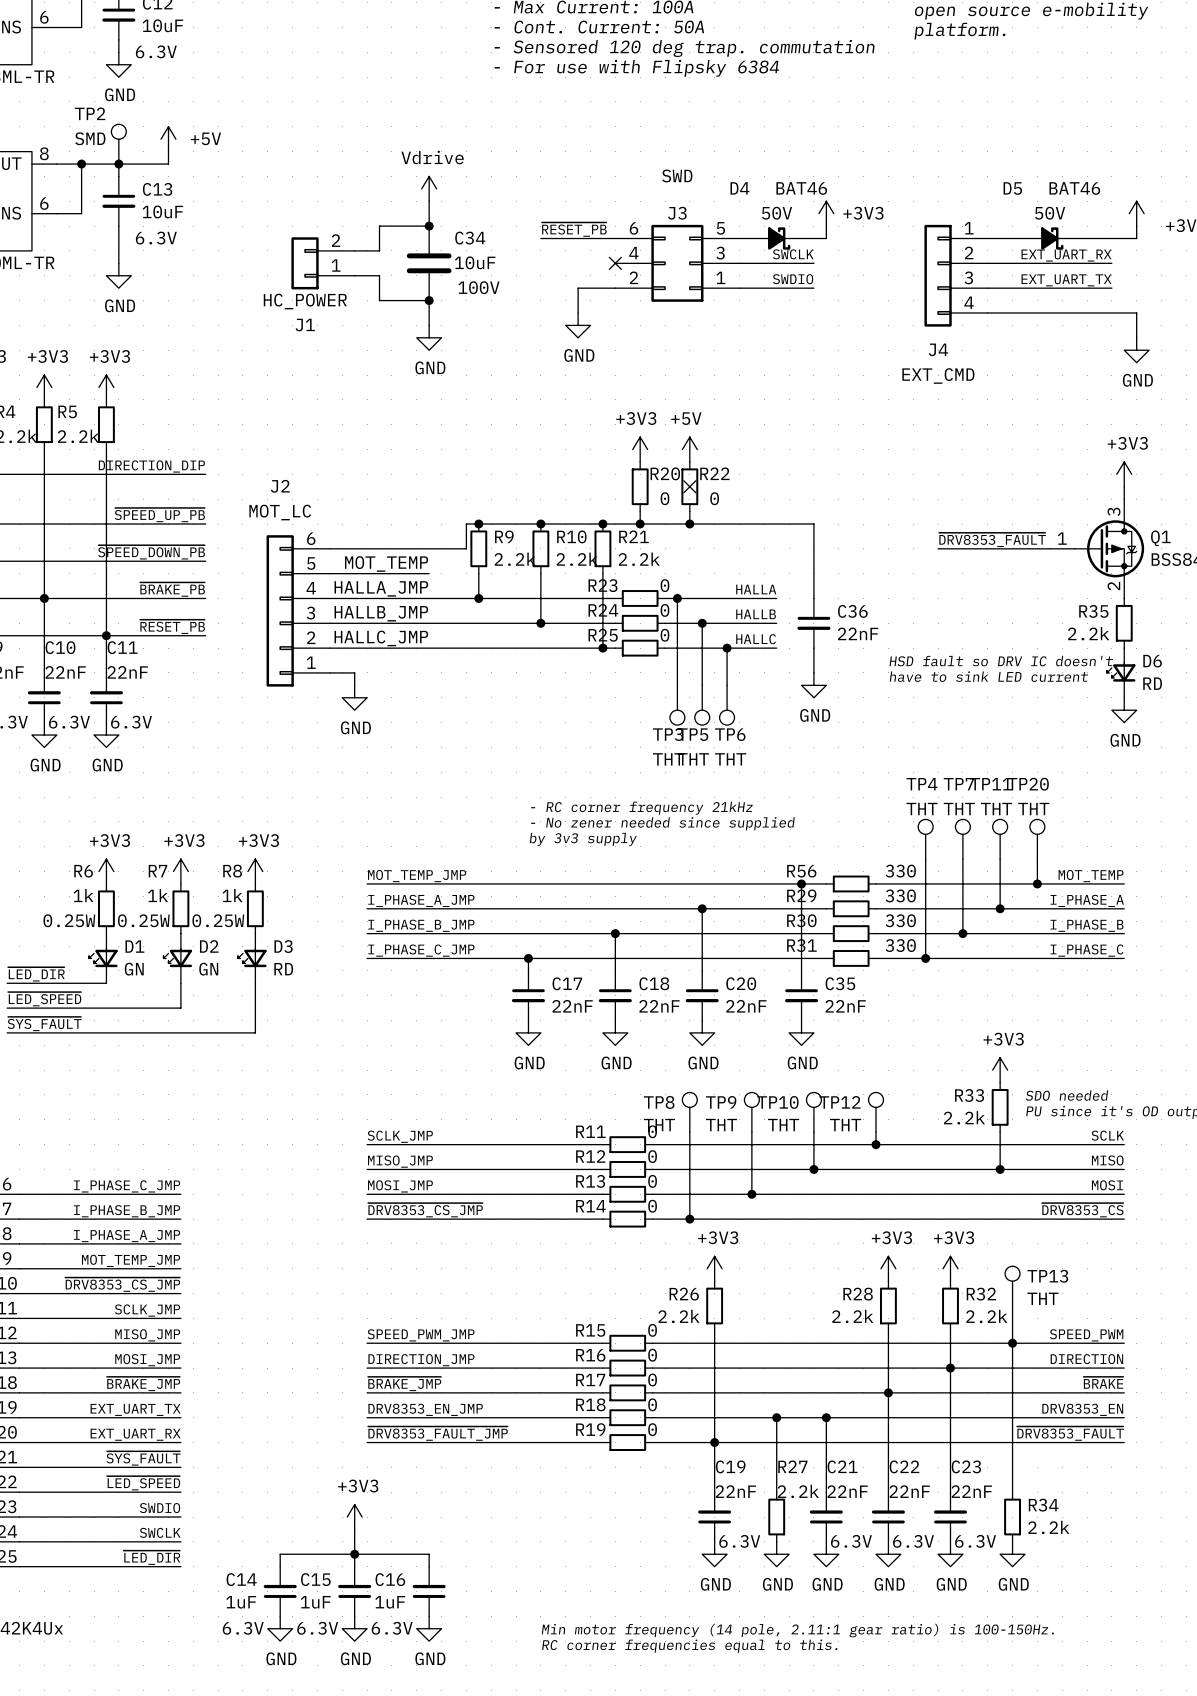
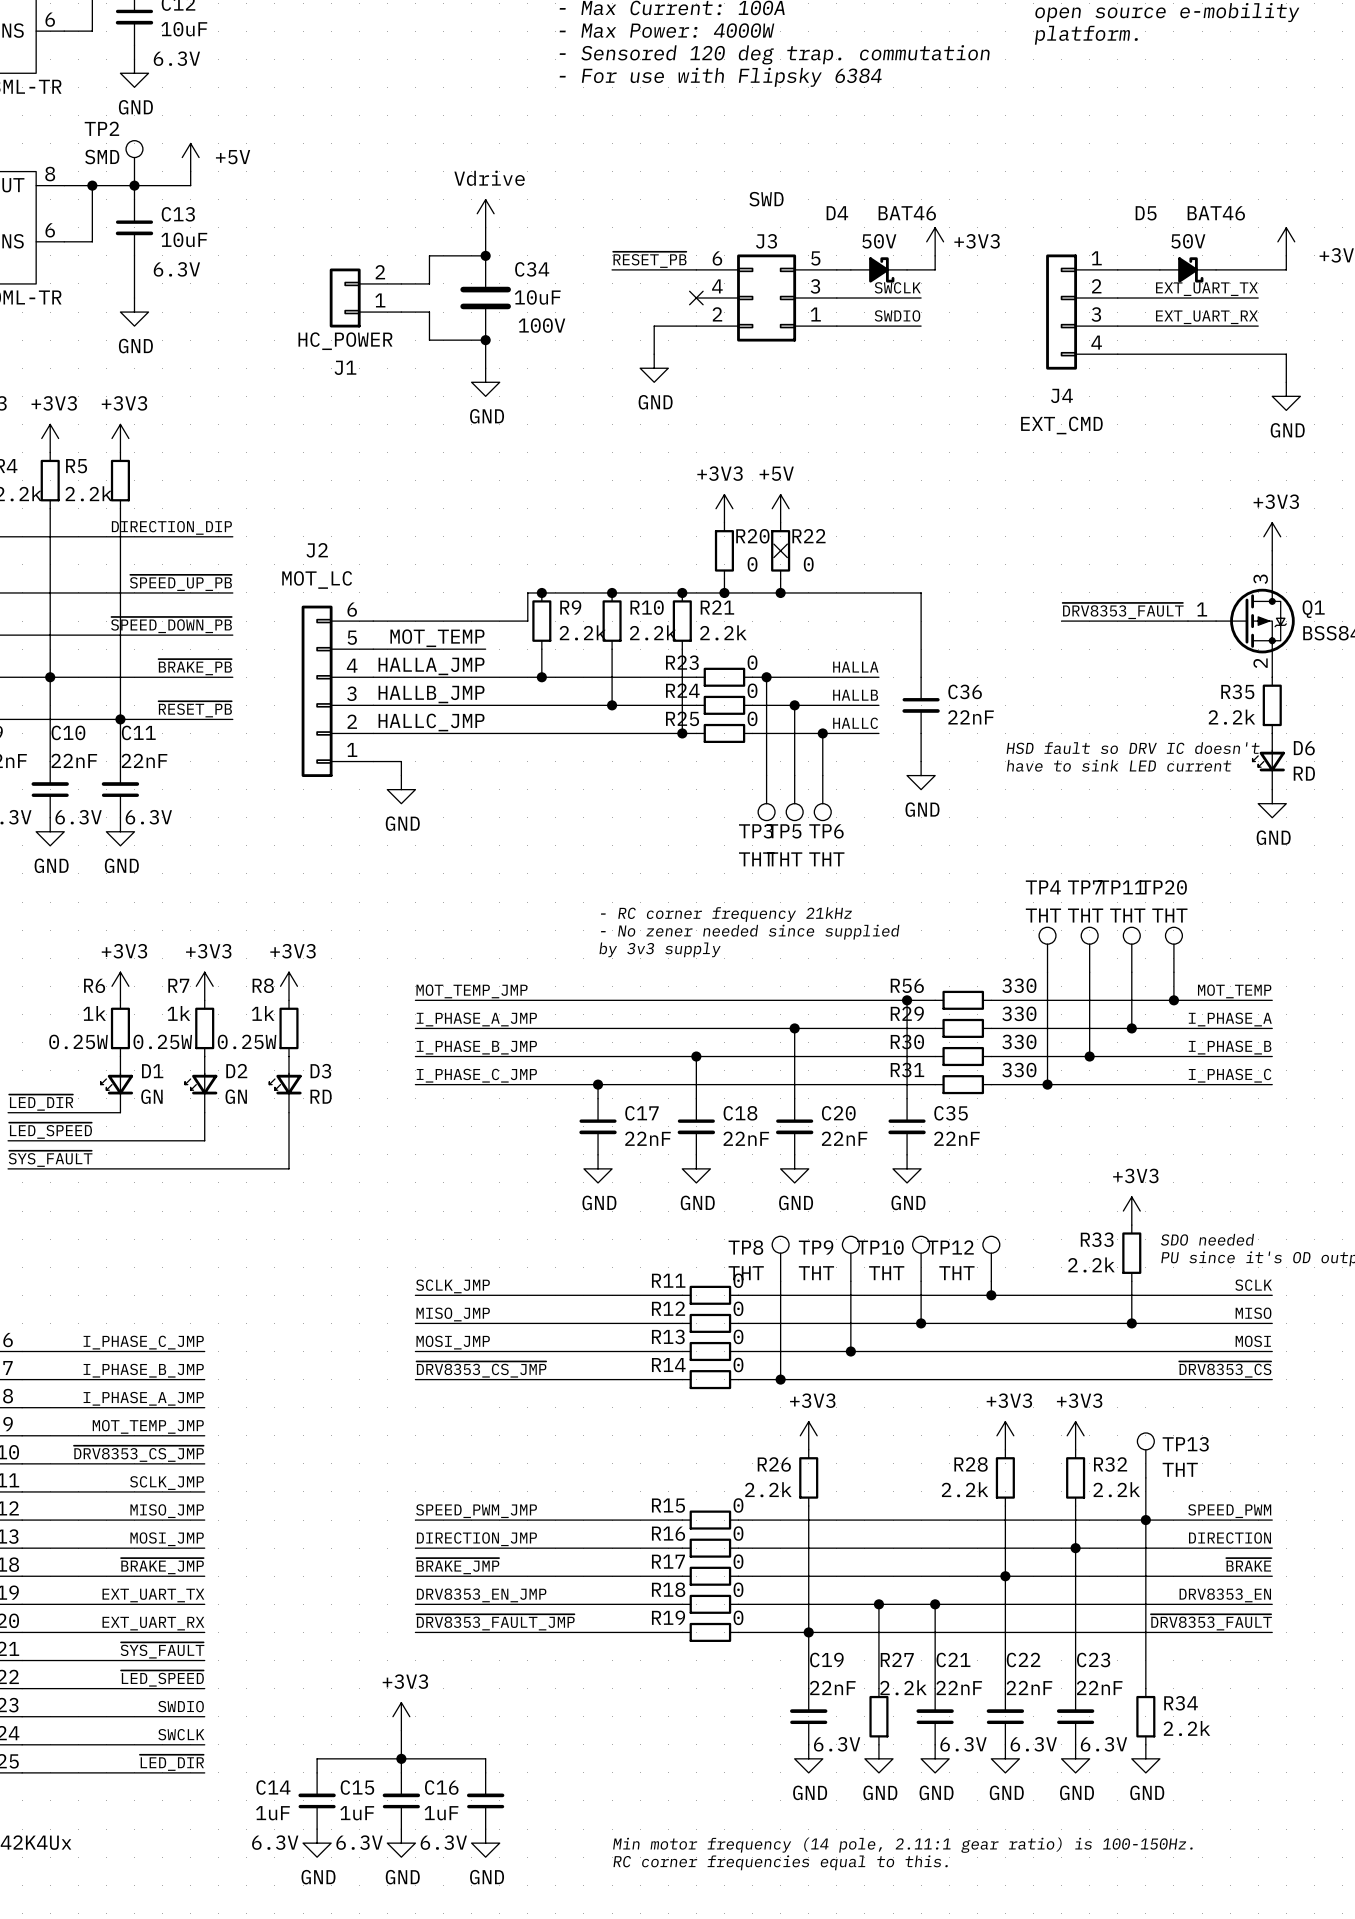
text: - Cont. Current: 50A (599, 27) -> - Max Power: 4000W (666, 30)
label: EXT_UART_RX (1066, 255) -> EXT_UART_TX (1206, 289)
label: EXT_UART_TX (1066, 280) -> EXT_UART_RX (1206, 317)

